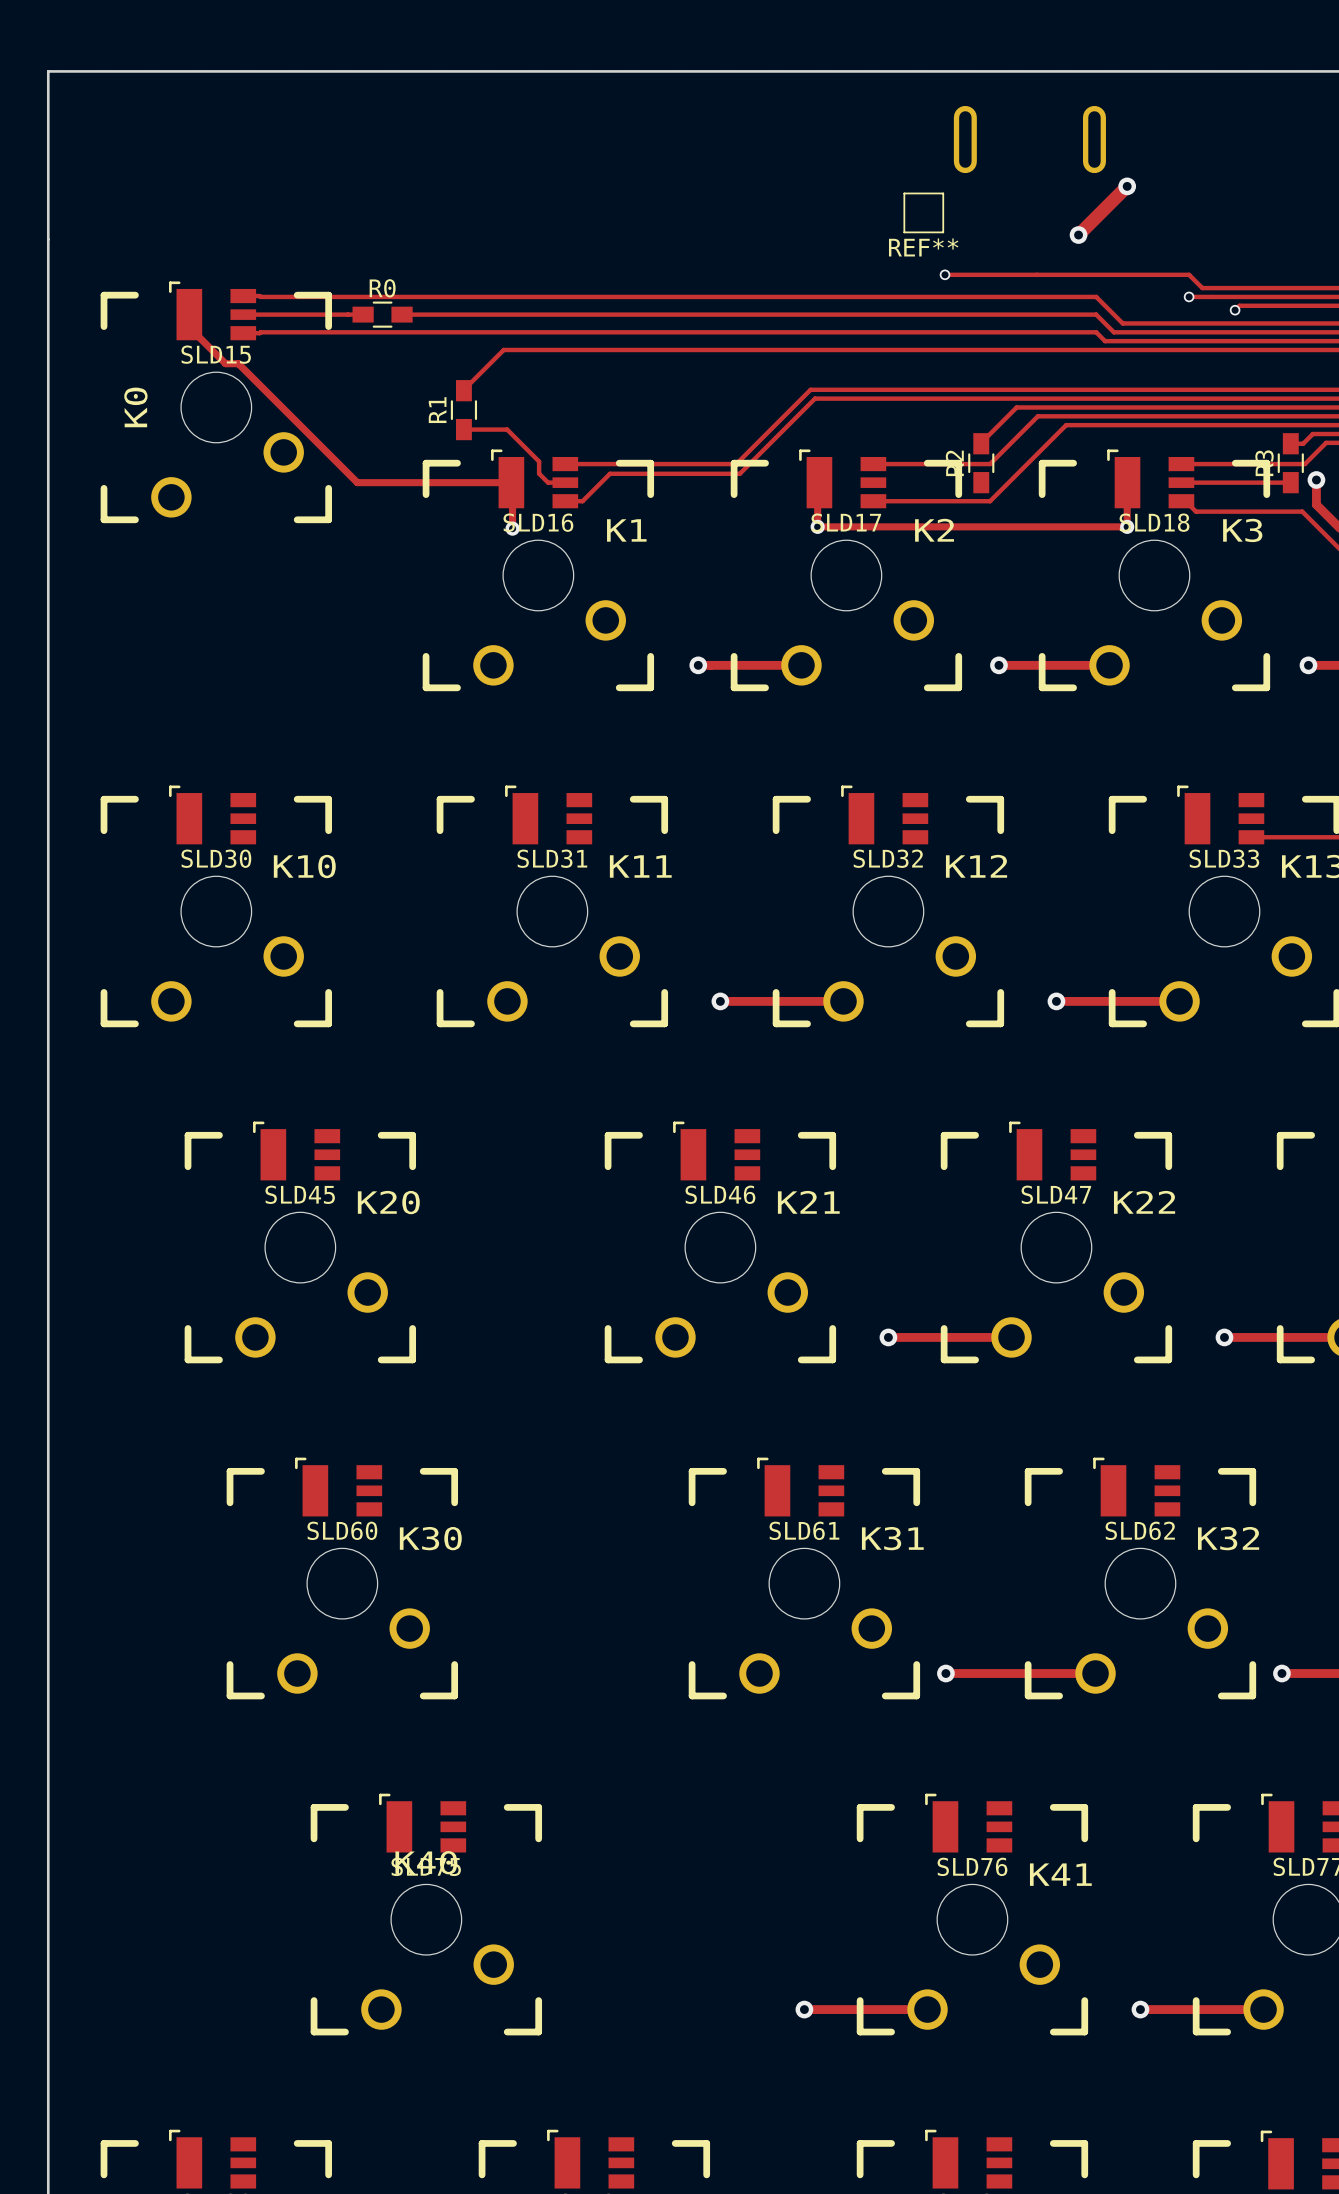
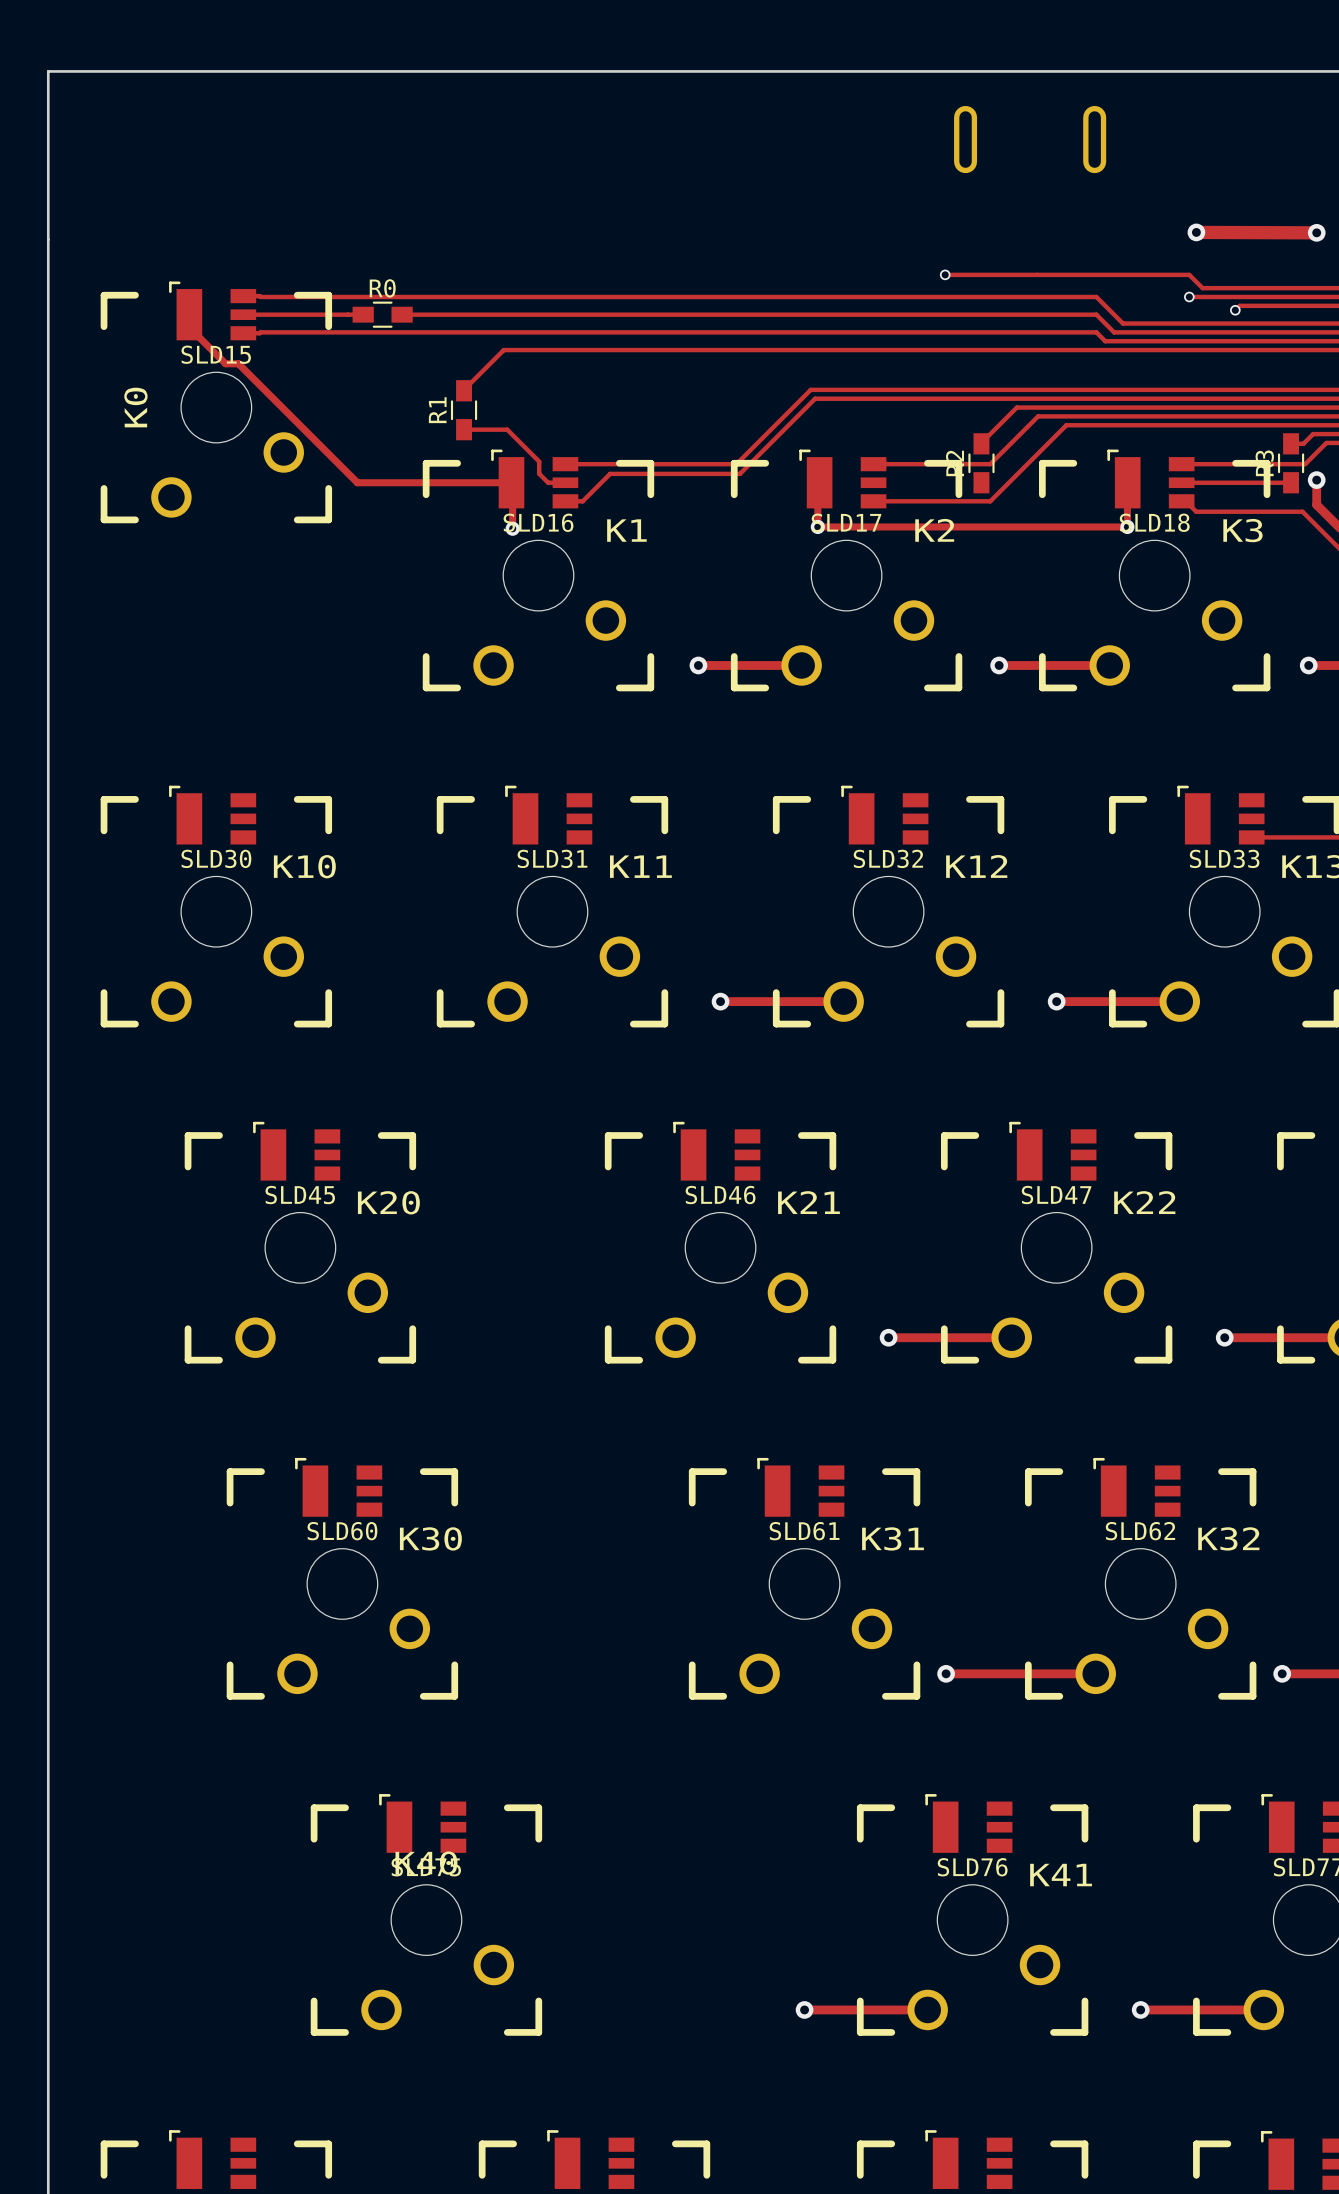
track: (1127, 186) (1078, 235) -> none
via: (1127, 186) -> none
REF**: (923, 212) -> none
track: none -> (1196, 232) (1316, 232)
via: none -> (1196, 232)
via: none -> (1316, 232)
via: (1078, 235) -> none

